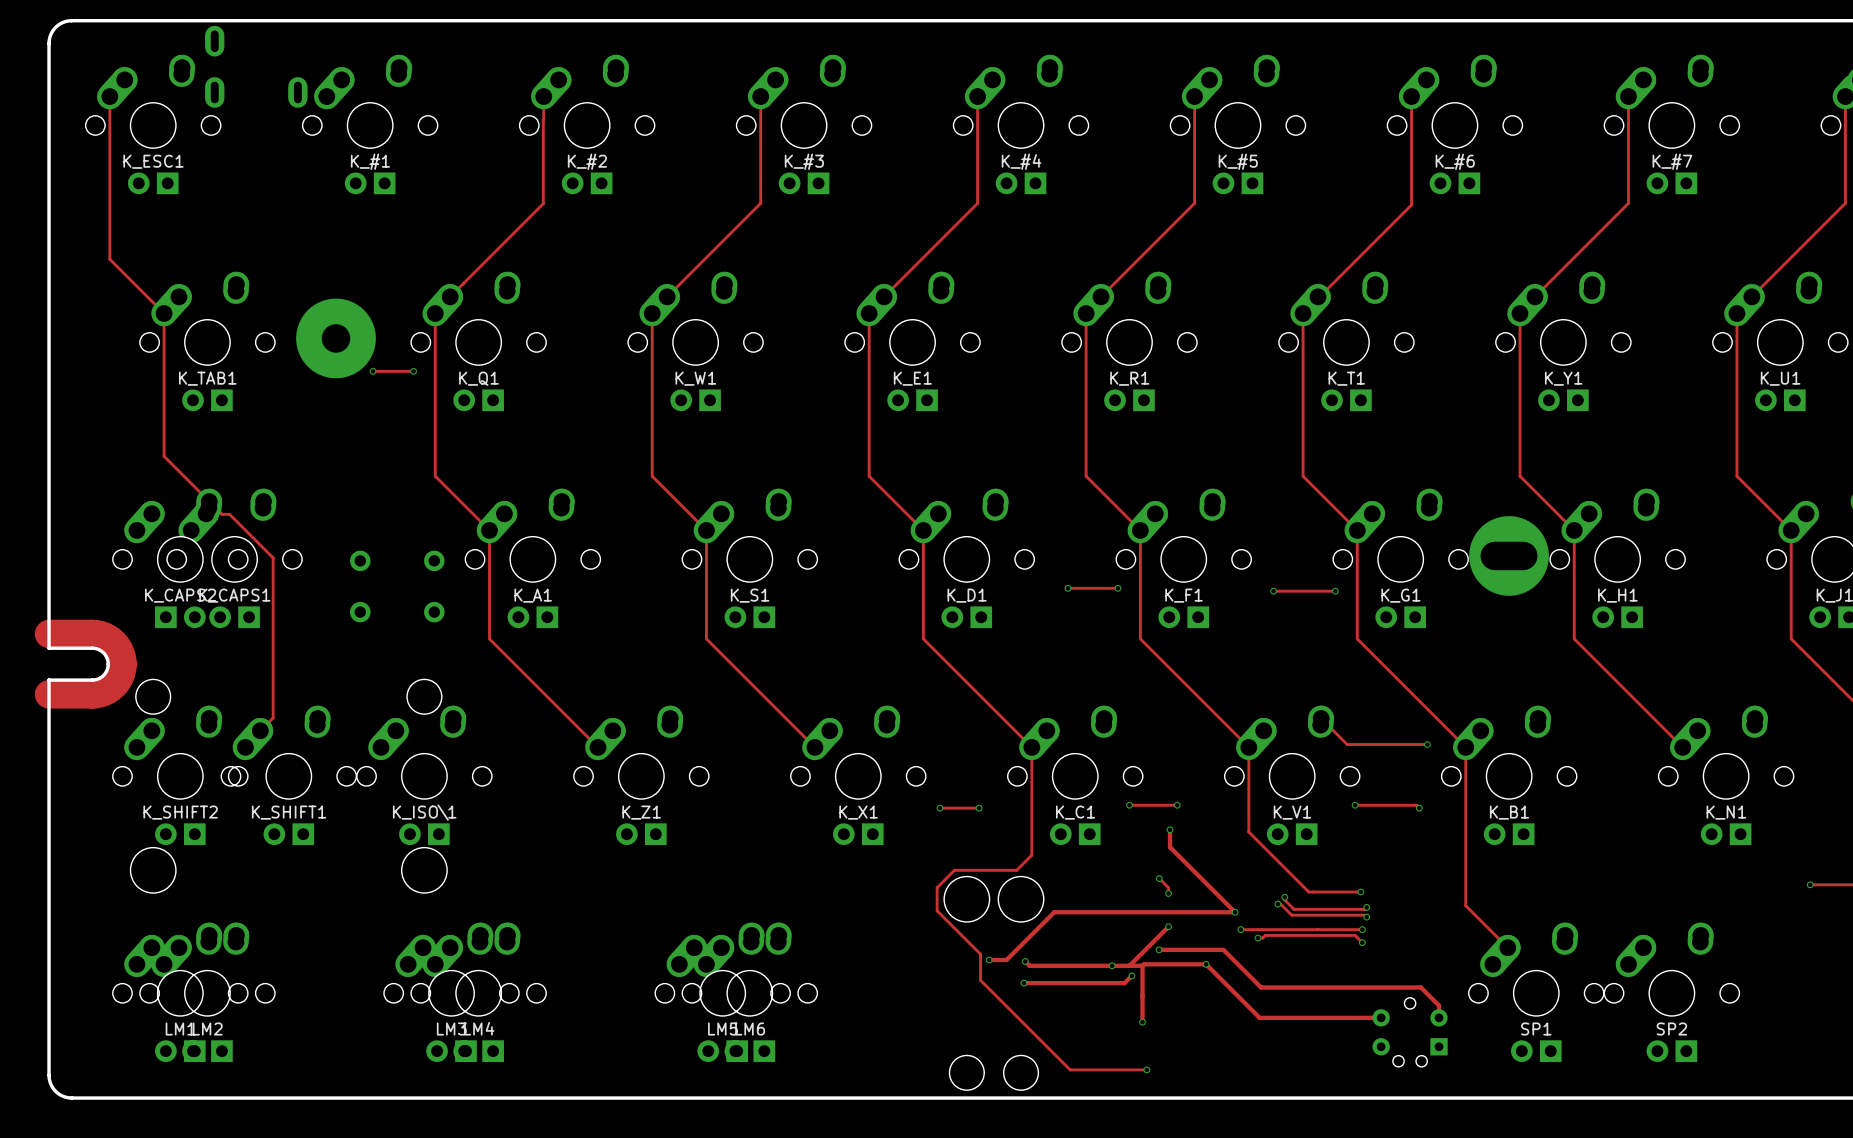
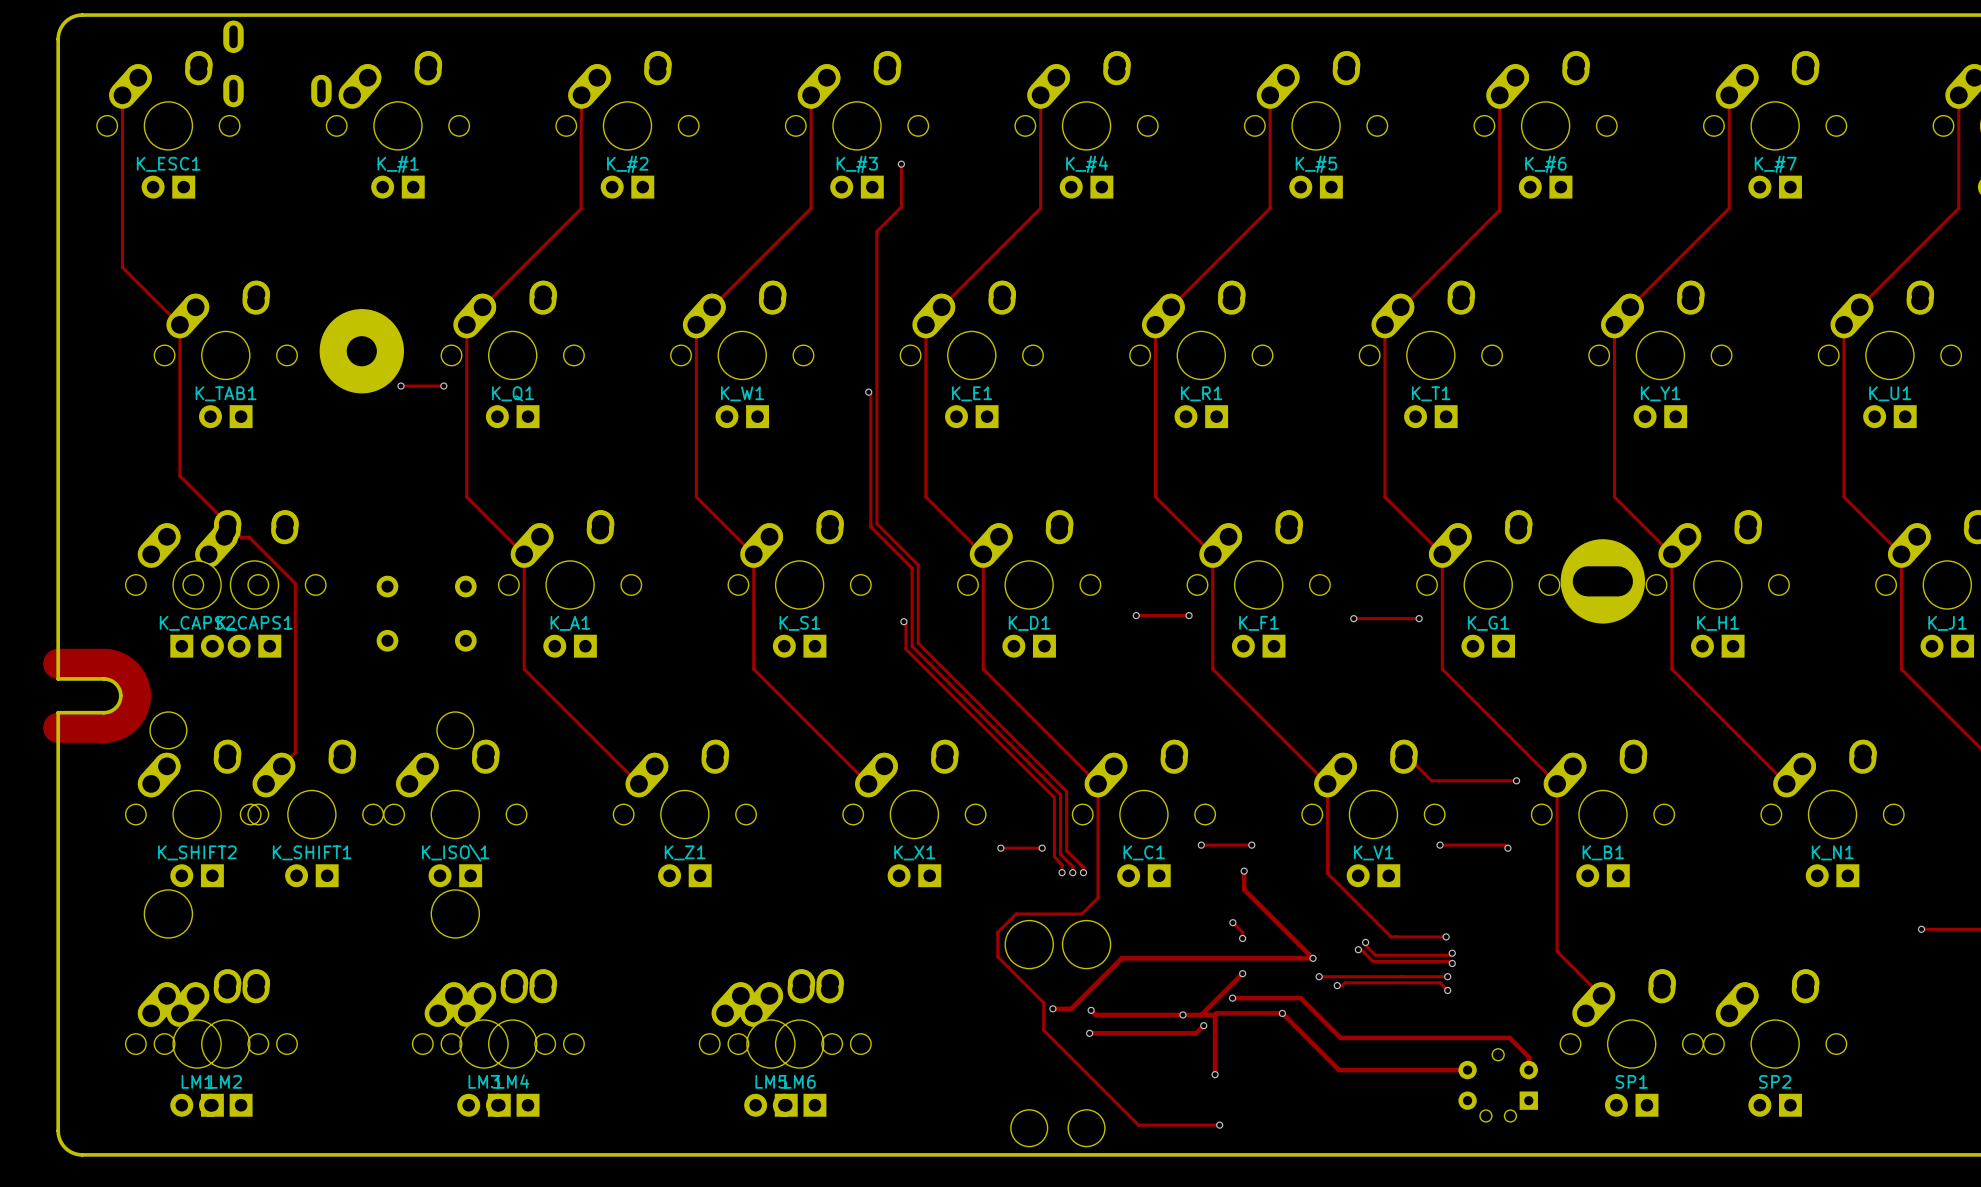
track: none -> (901, 164) (901, 207) (876, 231) (876, 523) (918, 565) (918, 643) (1066, 791) (1066, 850) (1083, 867) (1083, 872)
via: none -> (901, 164)
track: none -> (868, 392) (870, 394) (870, 526) (912, 568) (912, 646) (1060, 794) (1060, 854) (1072, 866) (1072, 872)
via: none -> (868, 392)
track: none -> (903, 621) (905, 623) (905, 649) (1054, 797) (1054, 856) (1062, 865) (1062, 872)
via: none -> (903, 621)
via: none -> (1062, 872)
via: none -> (1072, 872)
via: none -> (1083, 872)

